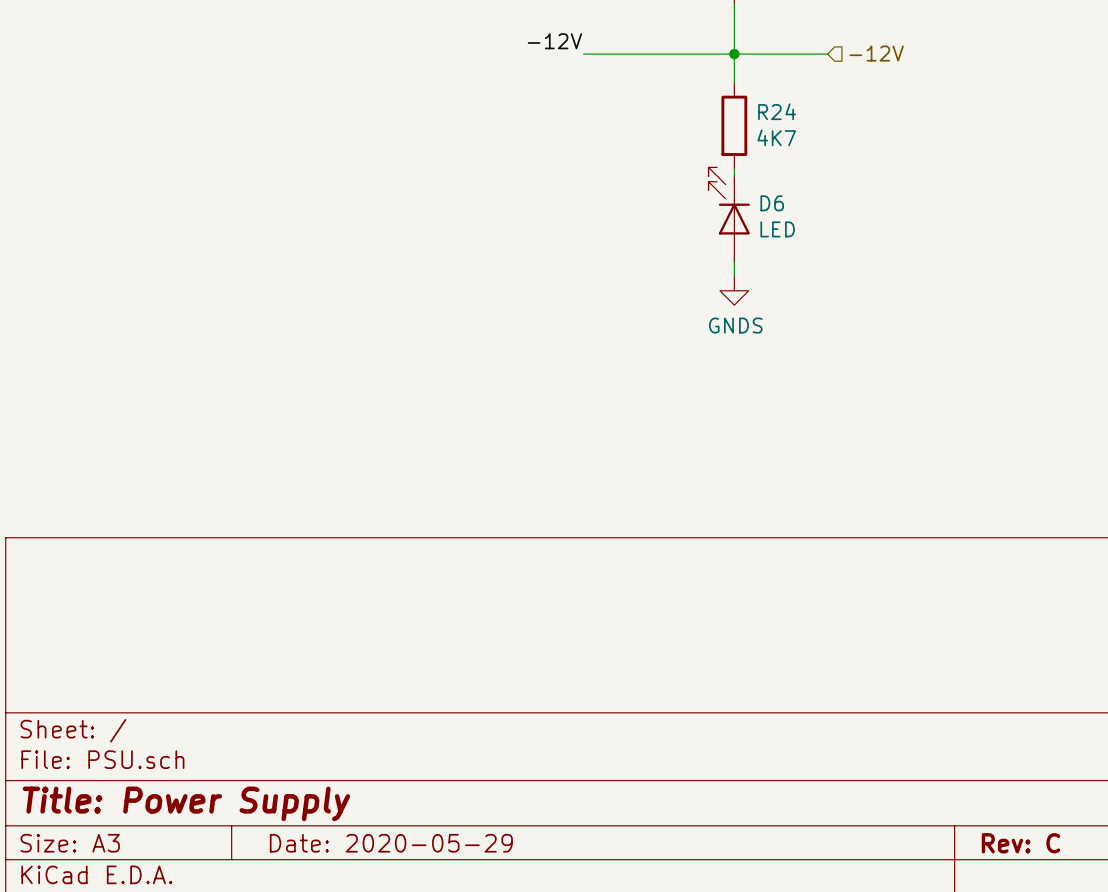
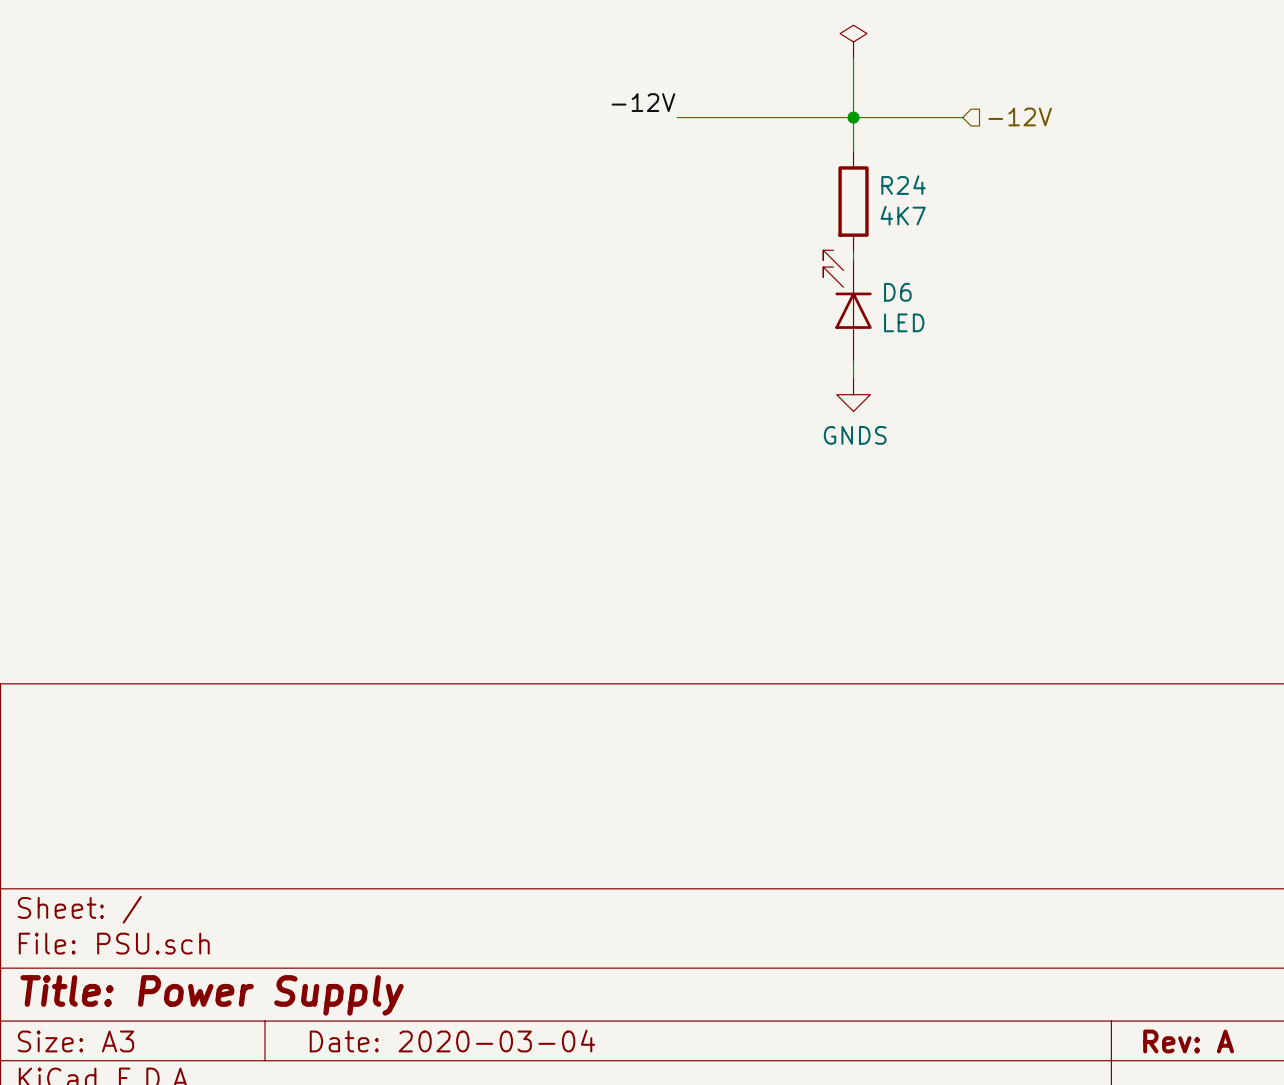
title block: Date: 2020-05-29 (391, 843) -> Date: 2020-03-04 (452, 1040)
title block: Rev: C (1020, 843) -> Rev: A (1188, 1041)

